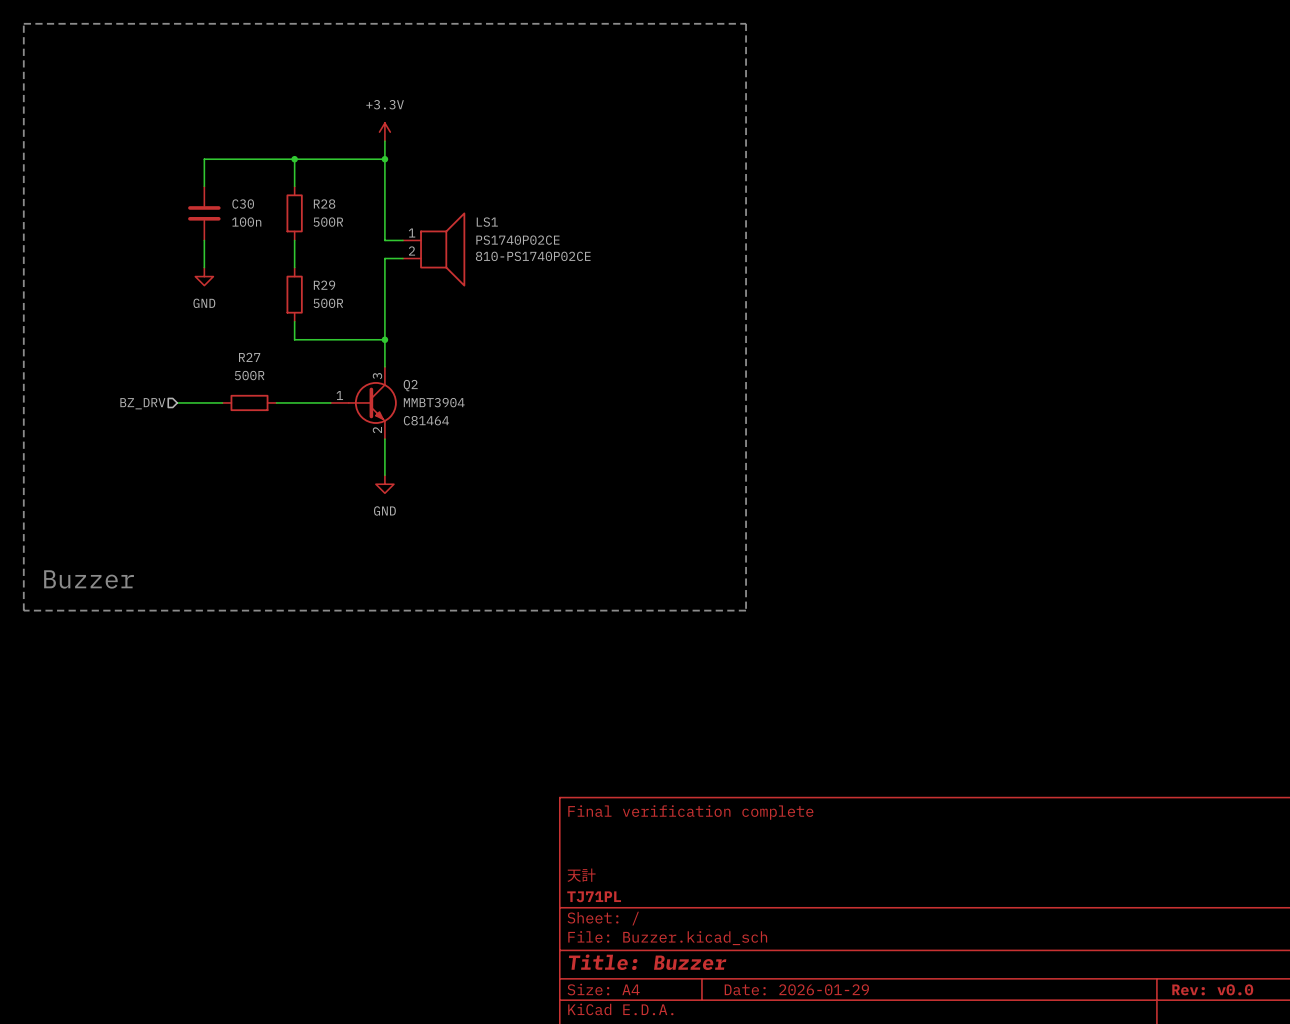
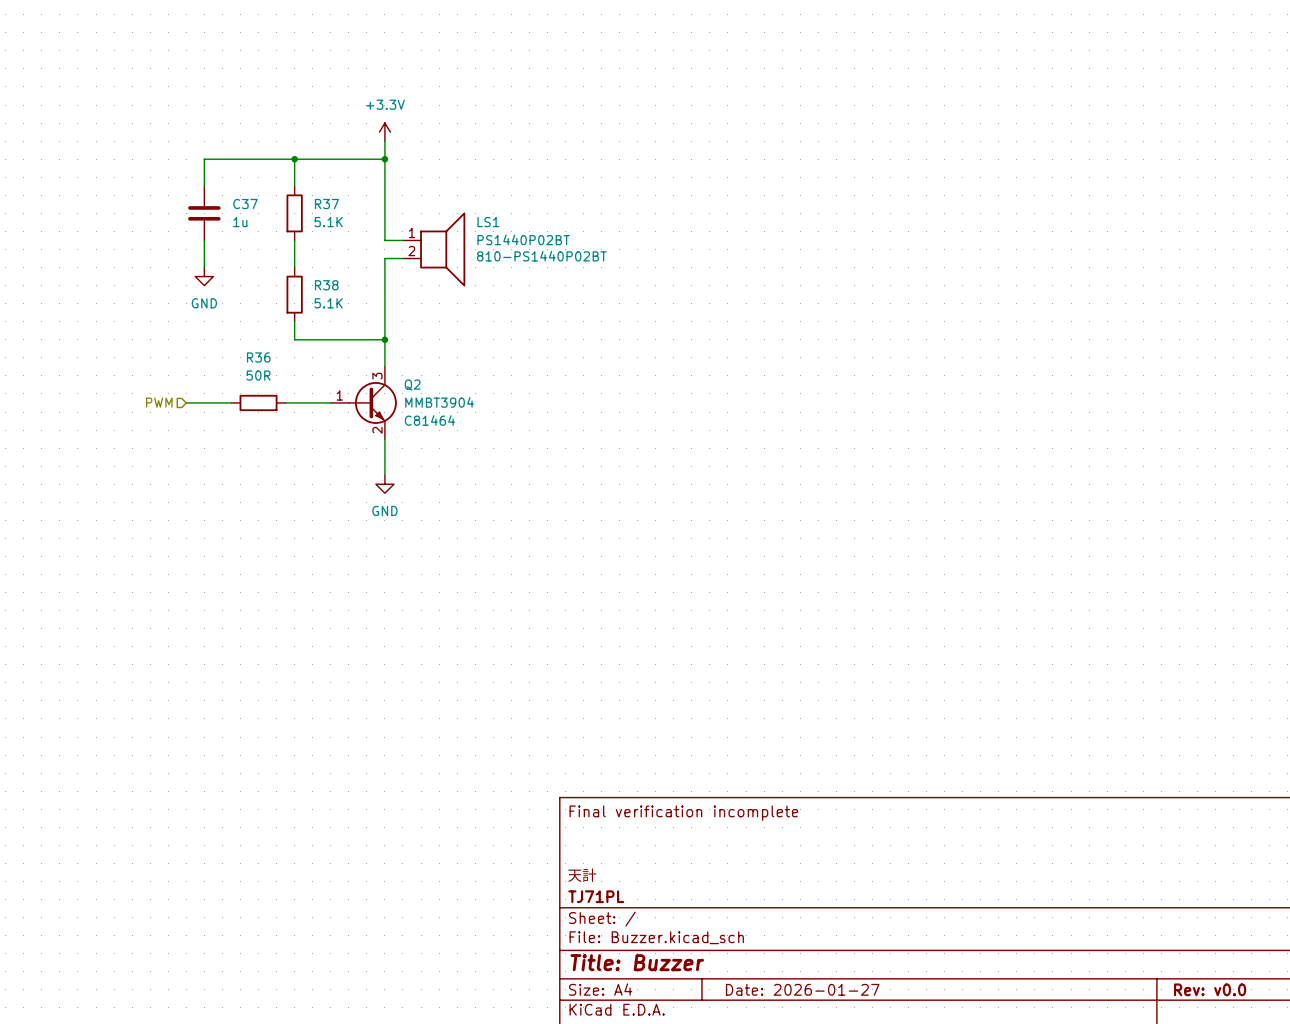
line: (23, 23) (746, 23) (746, 610) (23, 610) (23, 23) -> none
C30 name: C30 (243, 204) -> C37 (245, 204)
R28 name: R28 (324, 204) -> R37 (326, 204)
C30 value: 100n (246, 222) -> 1u (240, 222)
R28 value: 500R (328, 222) -> 5.1K (328, 222)
LS1 value: PS1740P02CE (517, 240) -> PS1440P02BT (523, 239)
LS1 text: 810-PS1740P02CE (533, 256) -> 810-PS1440P02BT (541, 256)
R29 name: R29 (324, 285) -> R38 (326, 285)
R29 value: 500R (328, 303) -> 5.1K (328, 303)
hierarchical label: none -> PWM (159, 402)
R27: 500R (249, 402) -> none
R36: none -> 50R (258, 402)
hierarchical label: BZ_DRV (142, 403) -> none
text: Buzzer (89, 579) -> none
title block: Final verification complete (690, 812) -> Final verification incomplete (683, 813)
title block: Date: 2026-01-29 (796, 989) -> Date: 2026-01-27 (802, 989)

